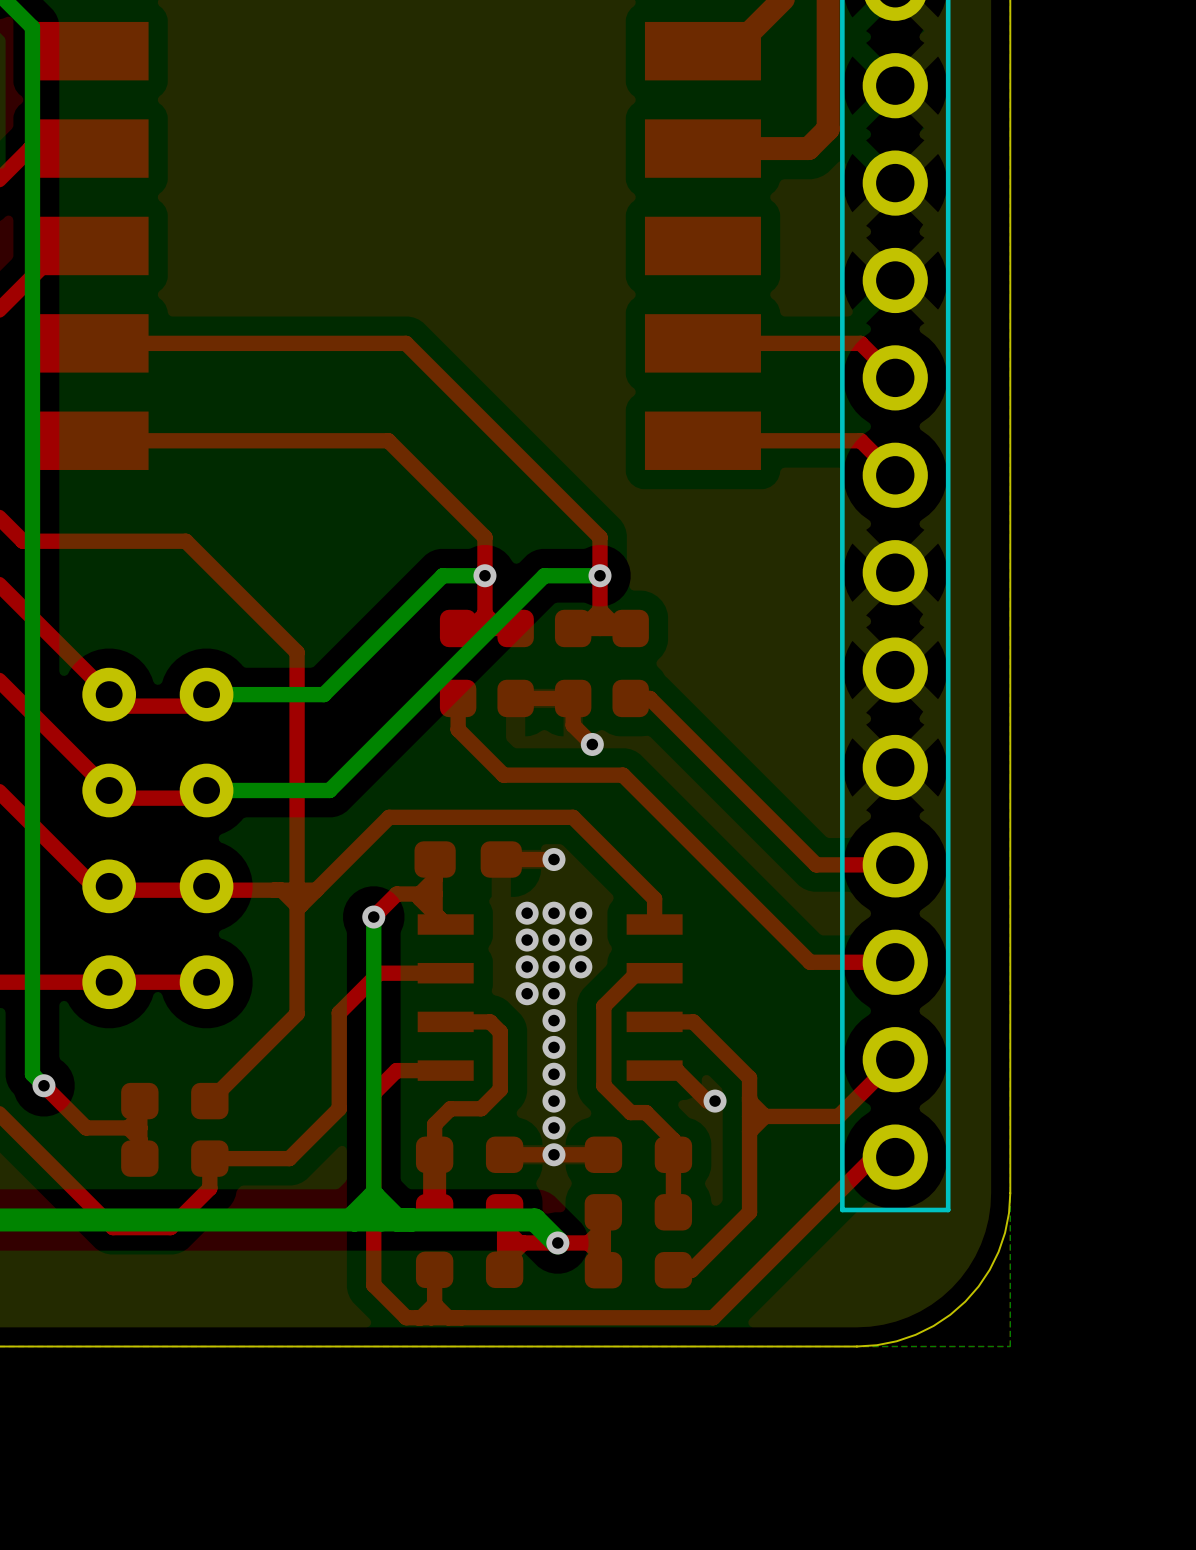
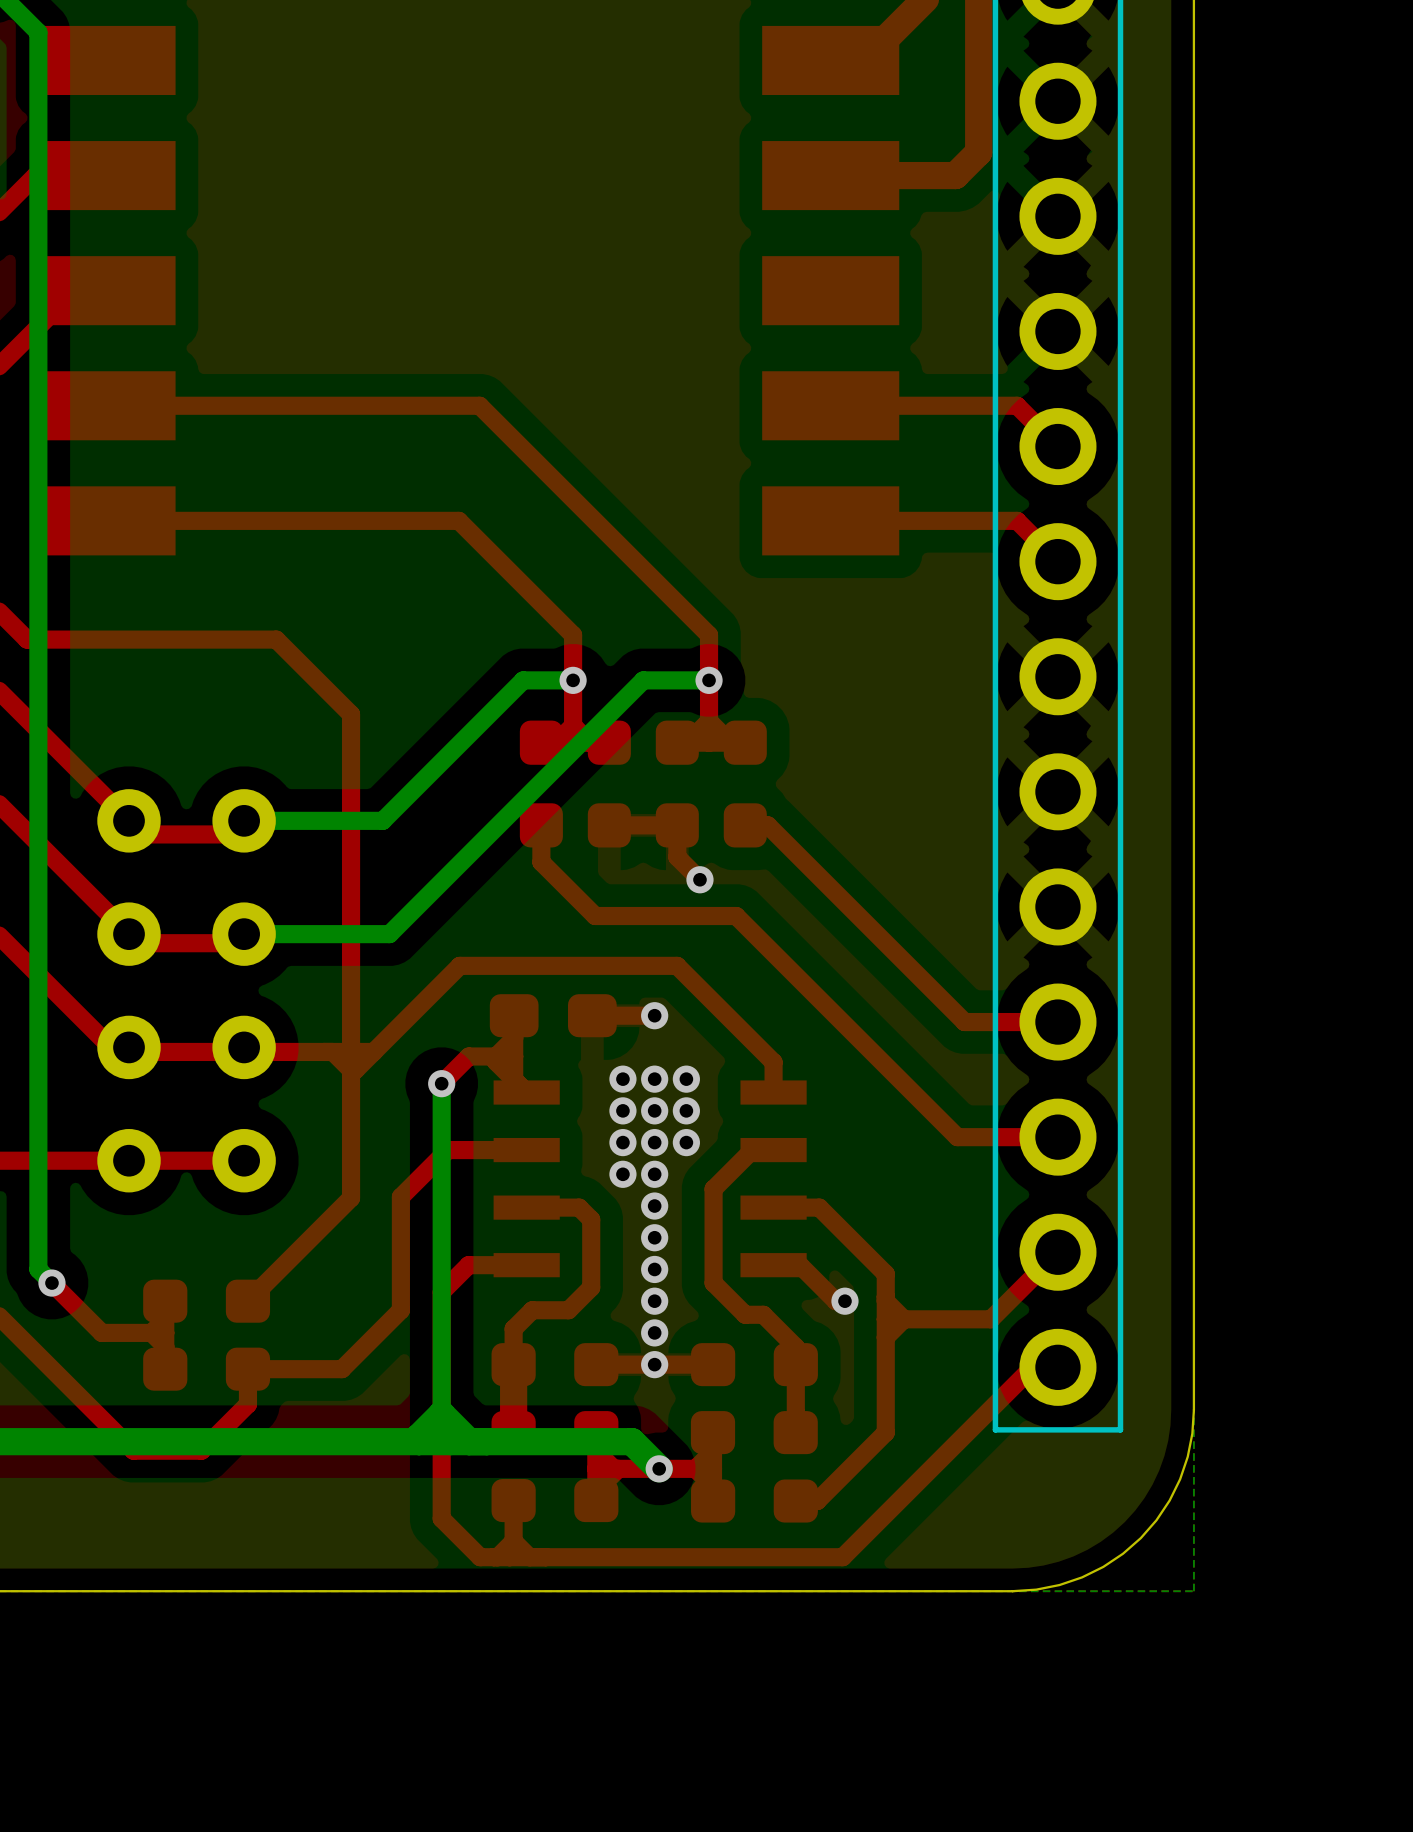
top track: (185, 541) (297, 652) -> (219, 639) (276, 639) (351, 714) (351, 771)

